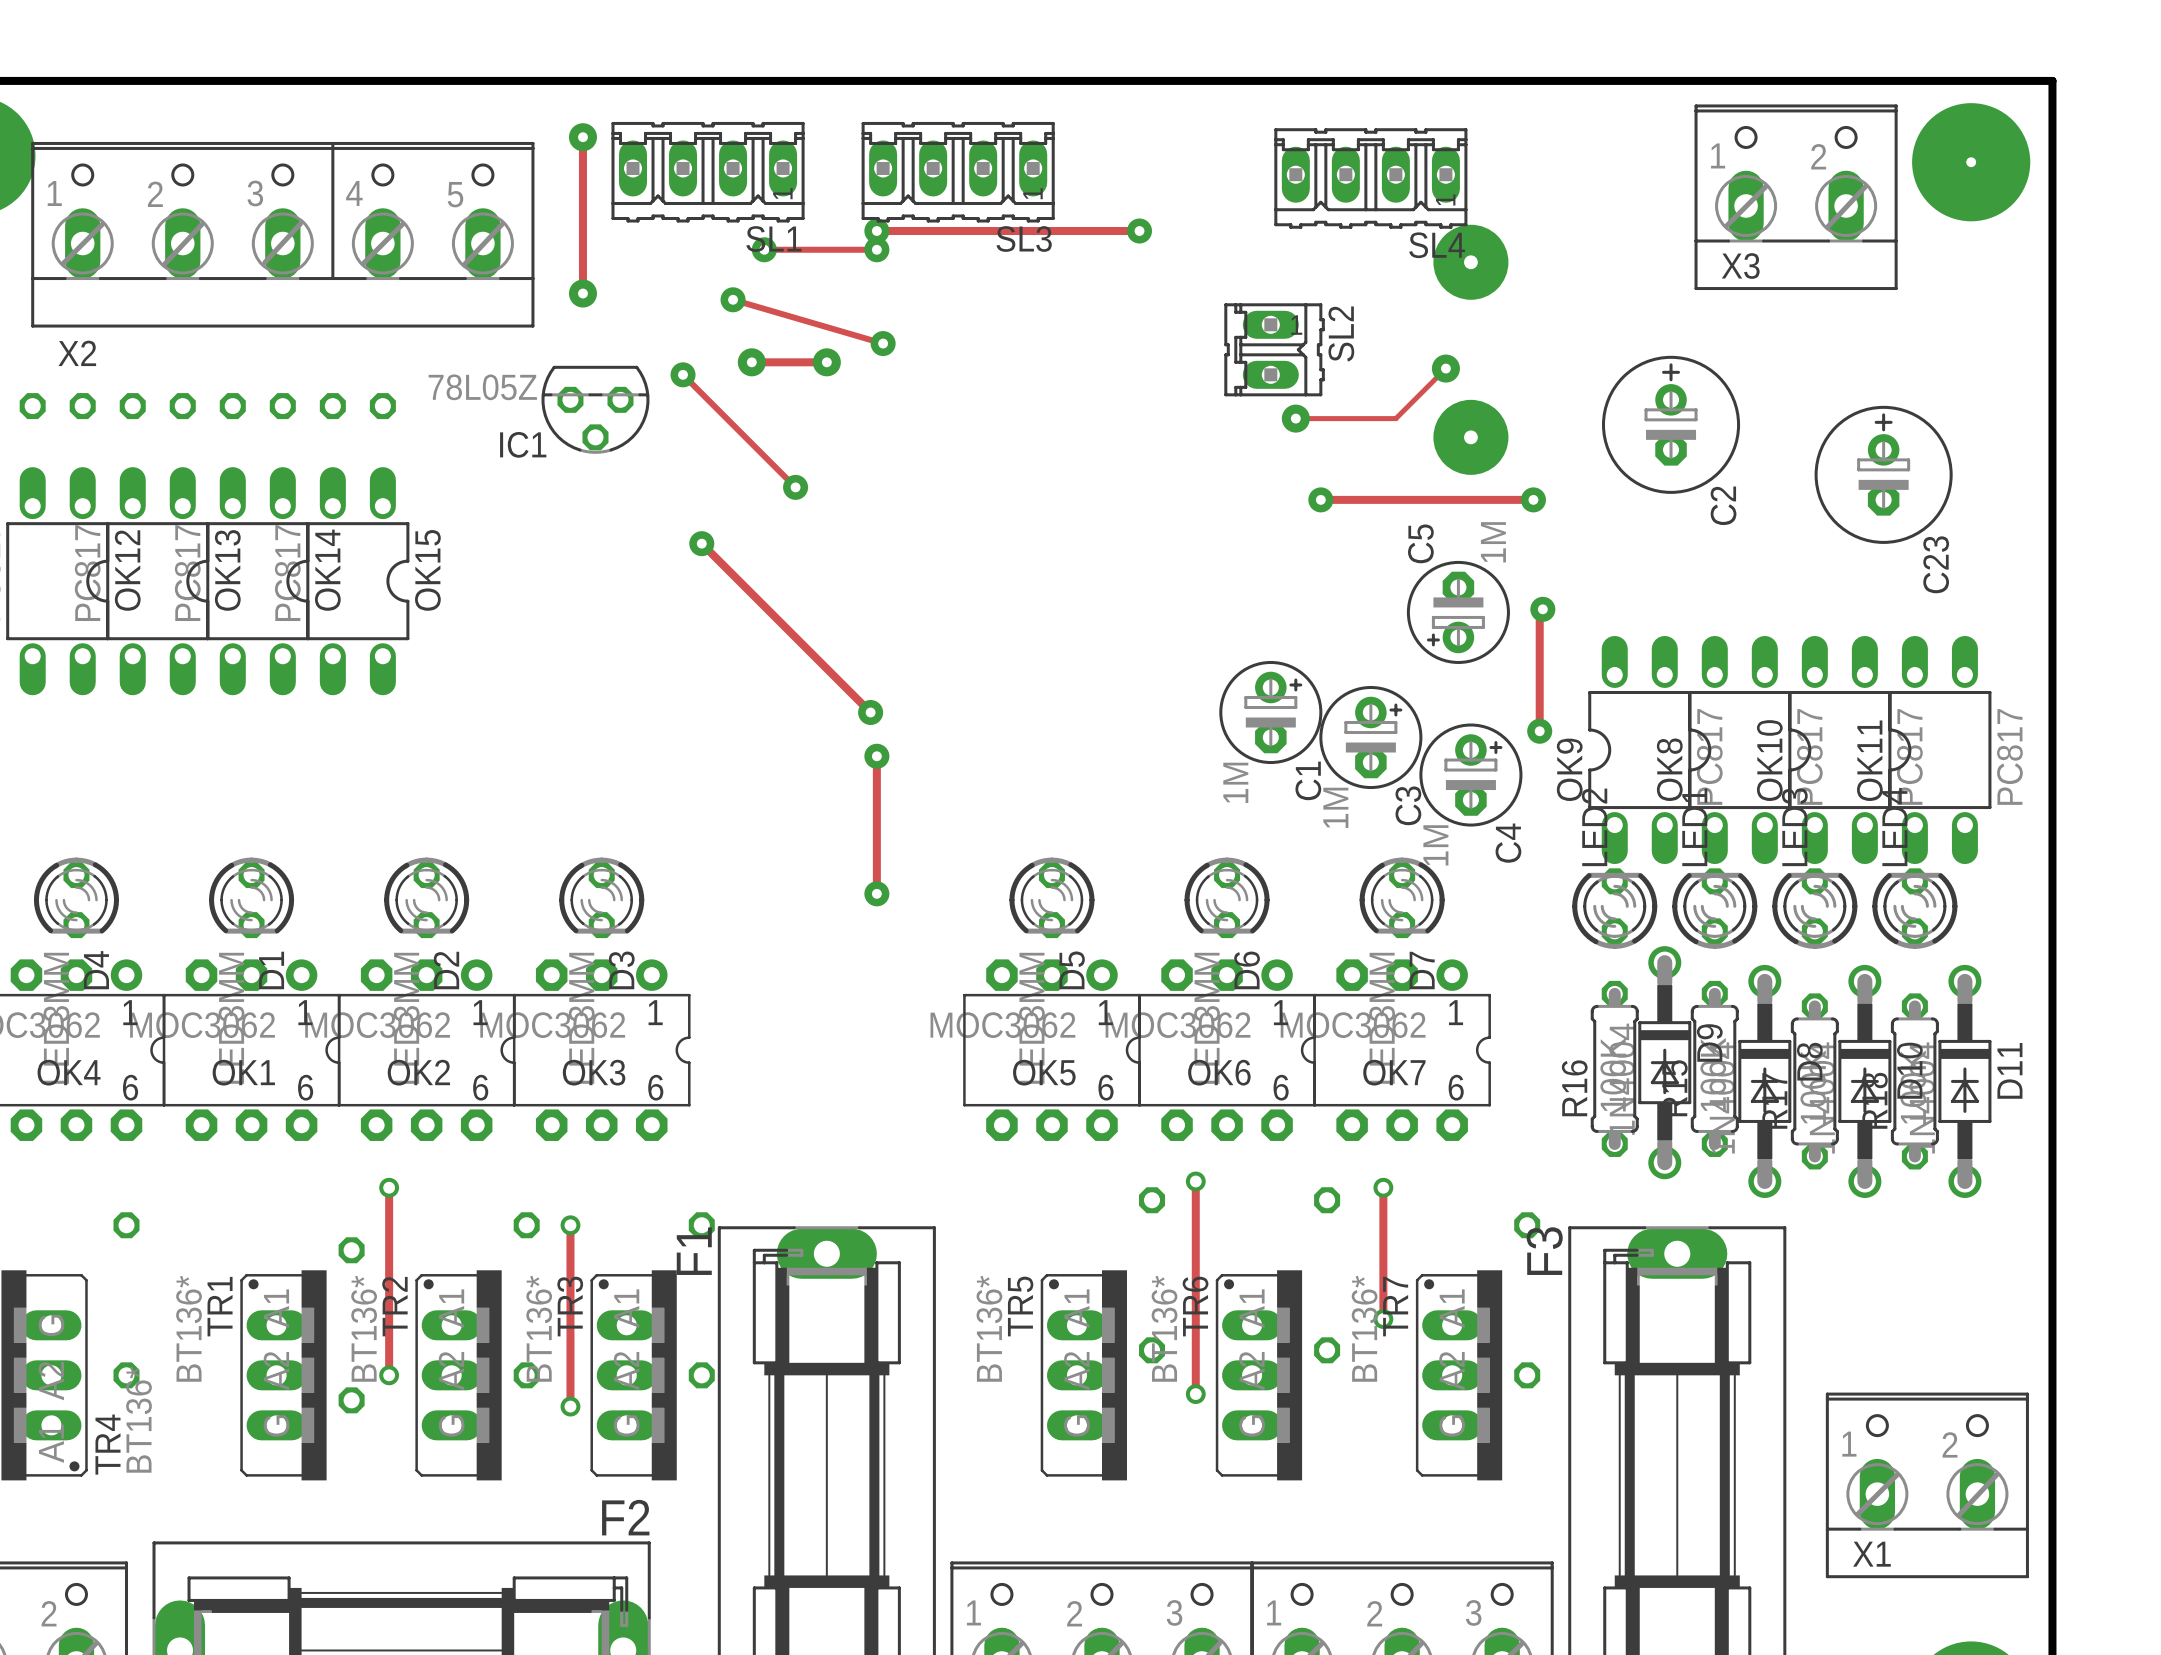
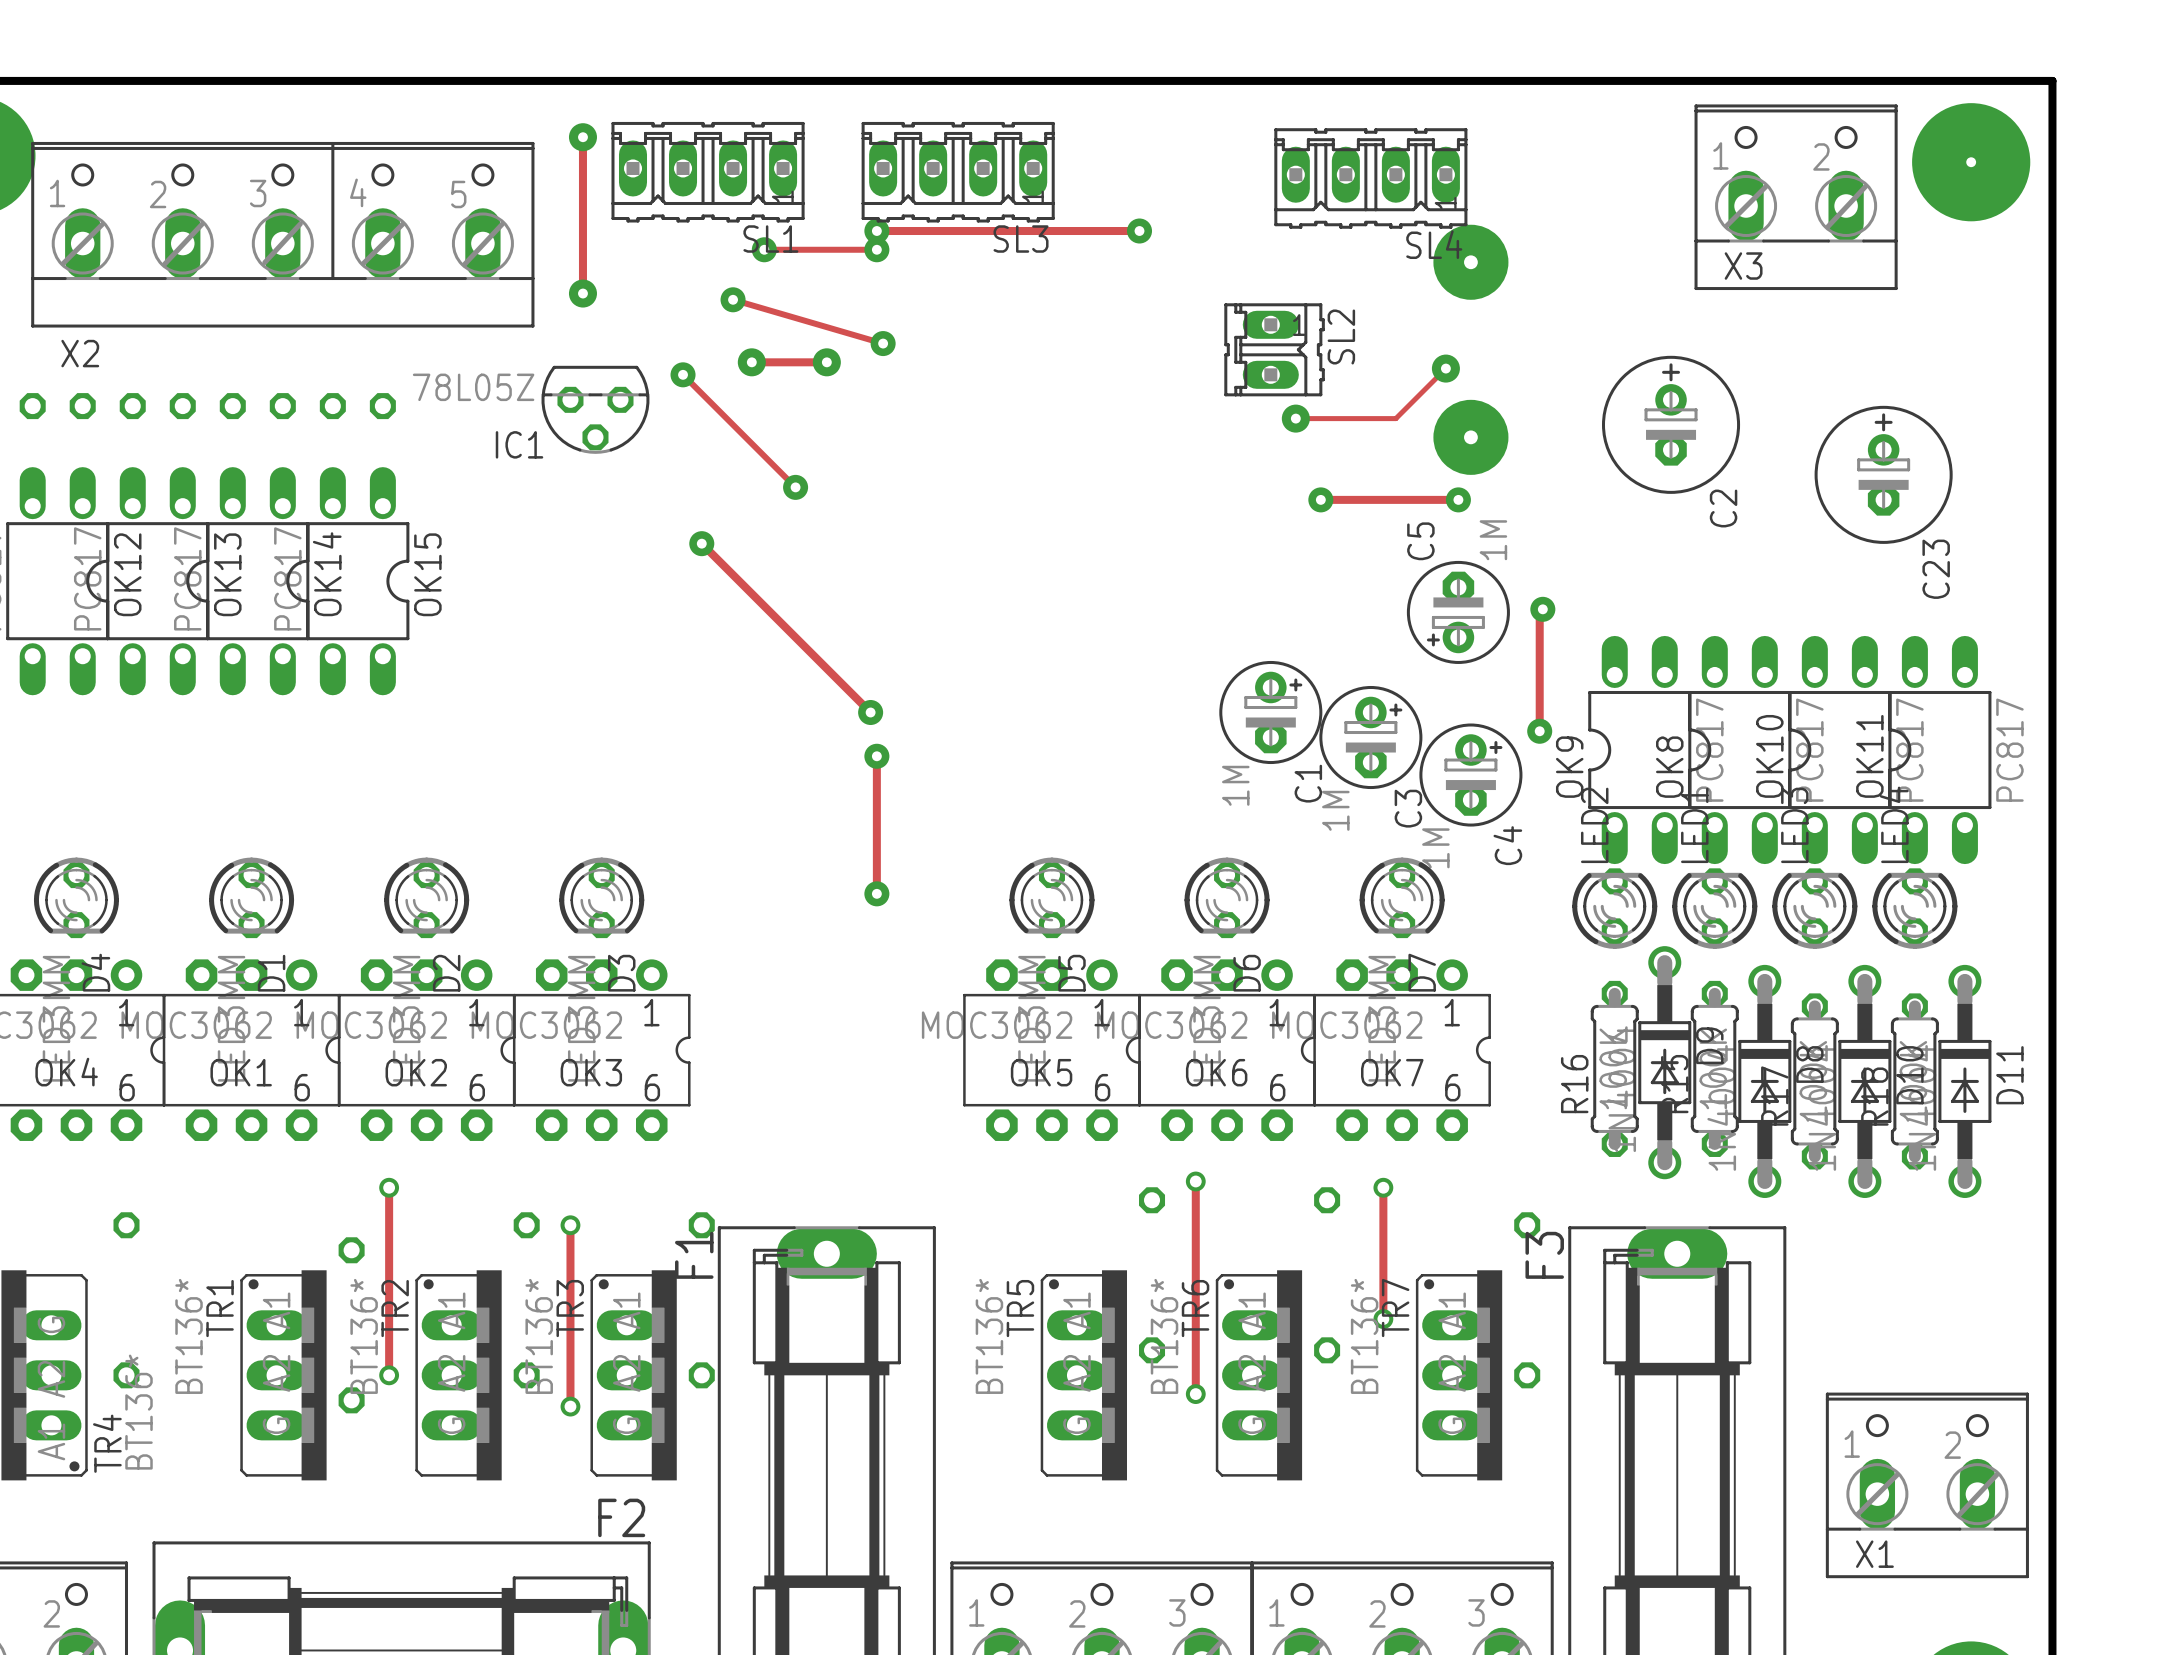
track: (1458, 499) (1533, 499) -> none
via position: (1533, 499) -> (1458, 499)

